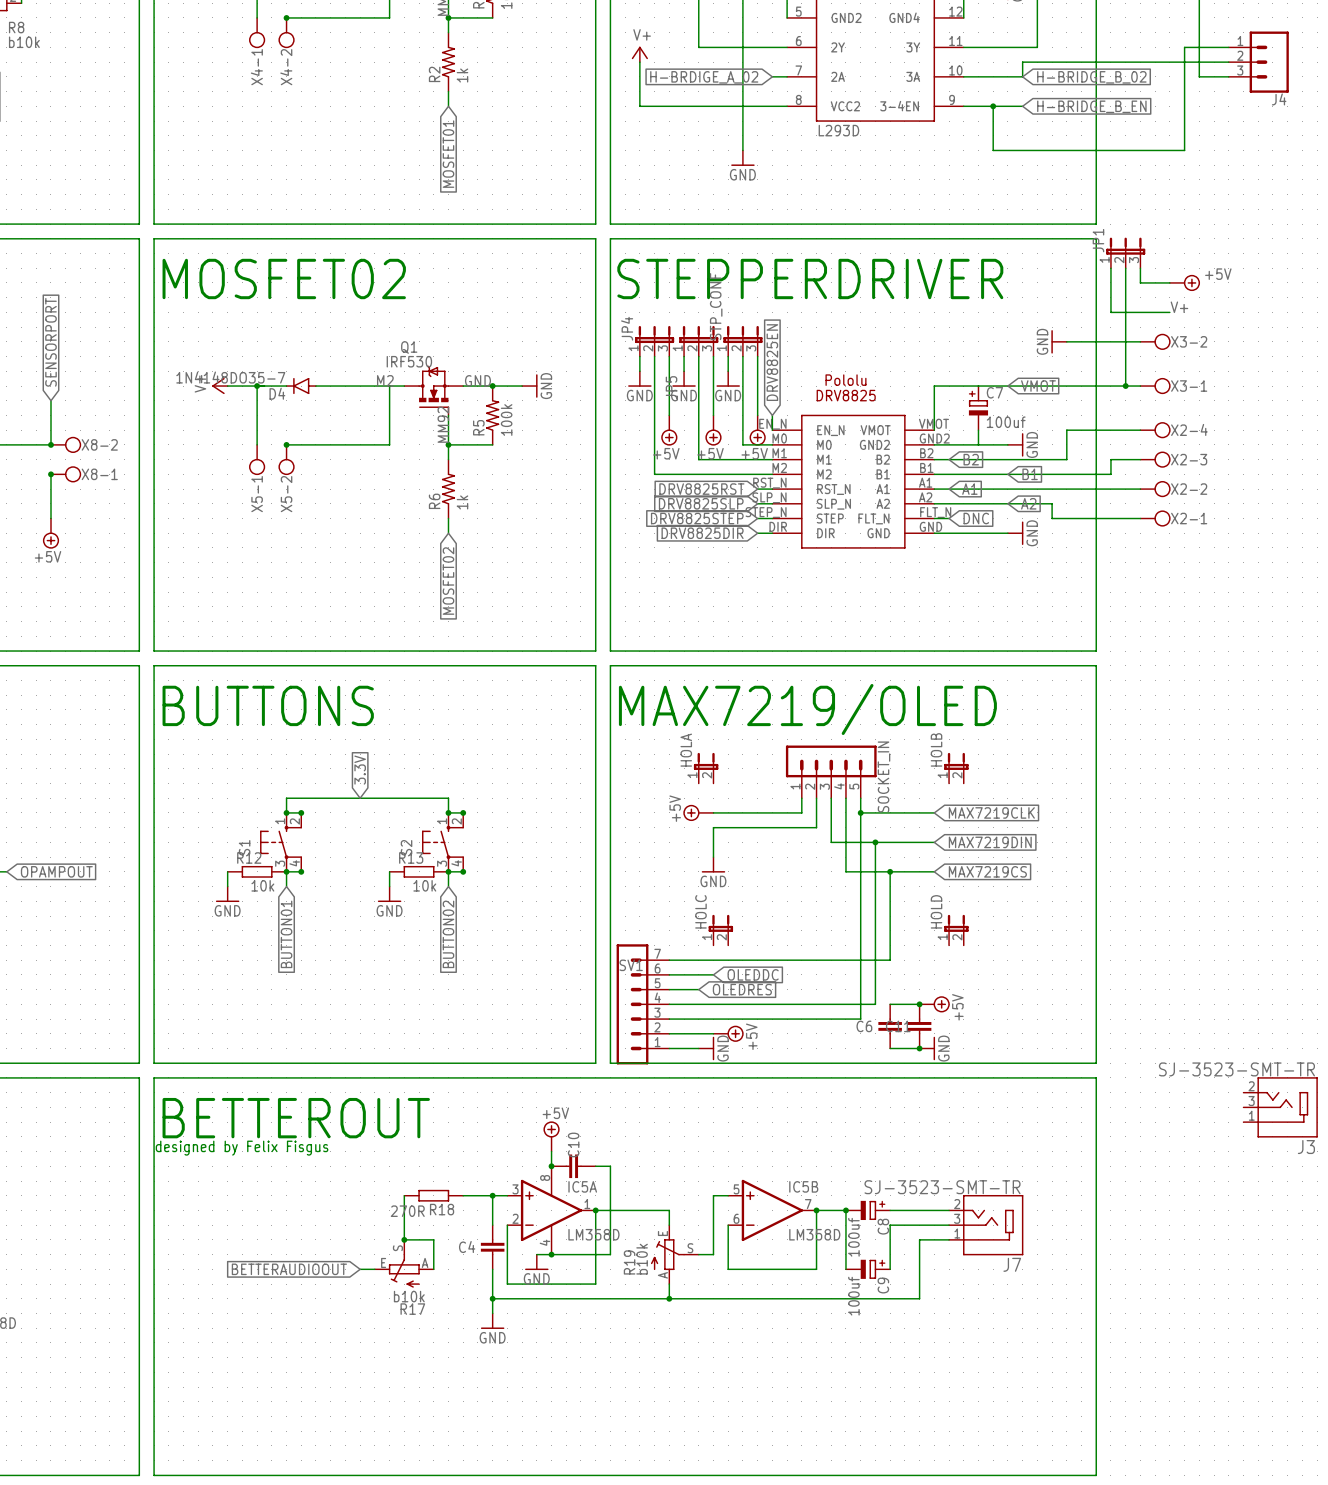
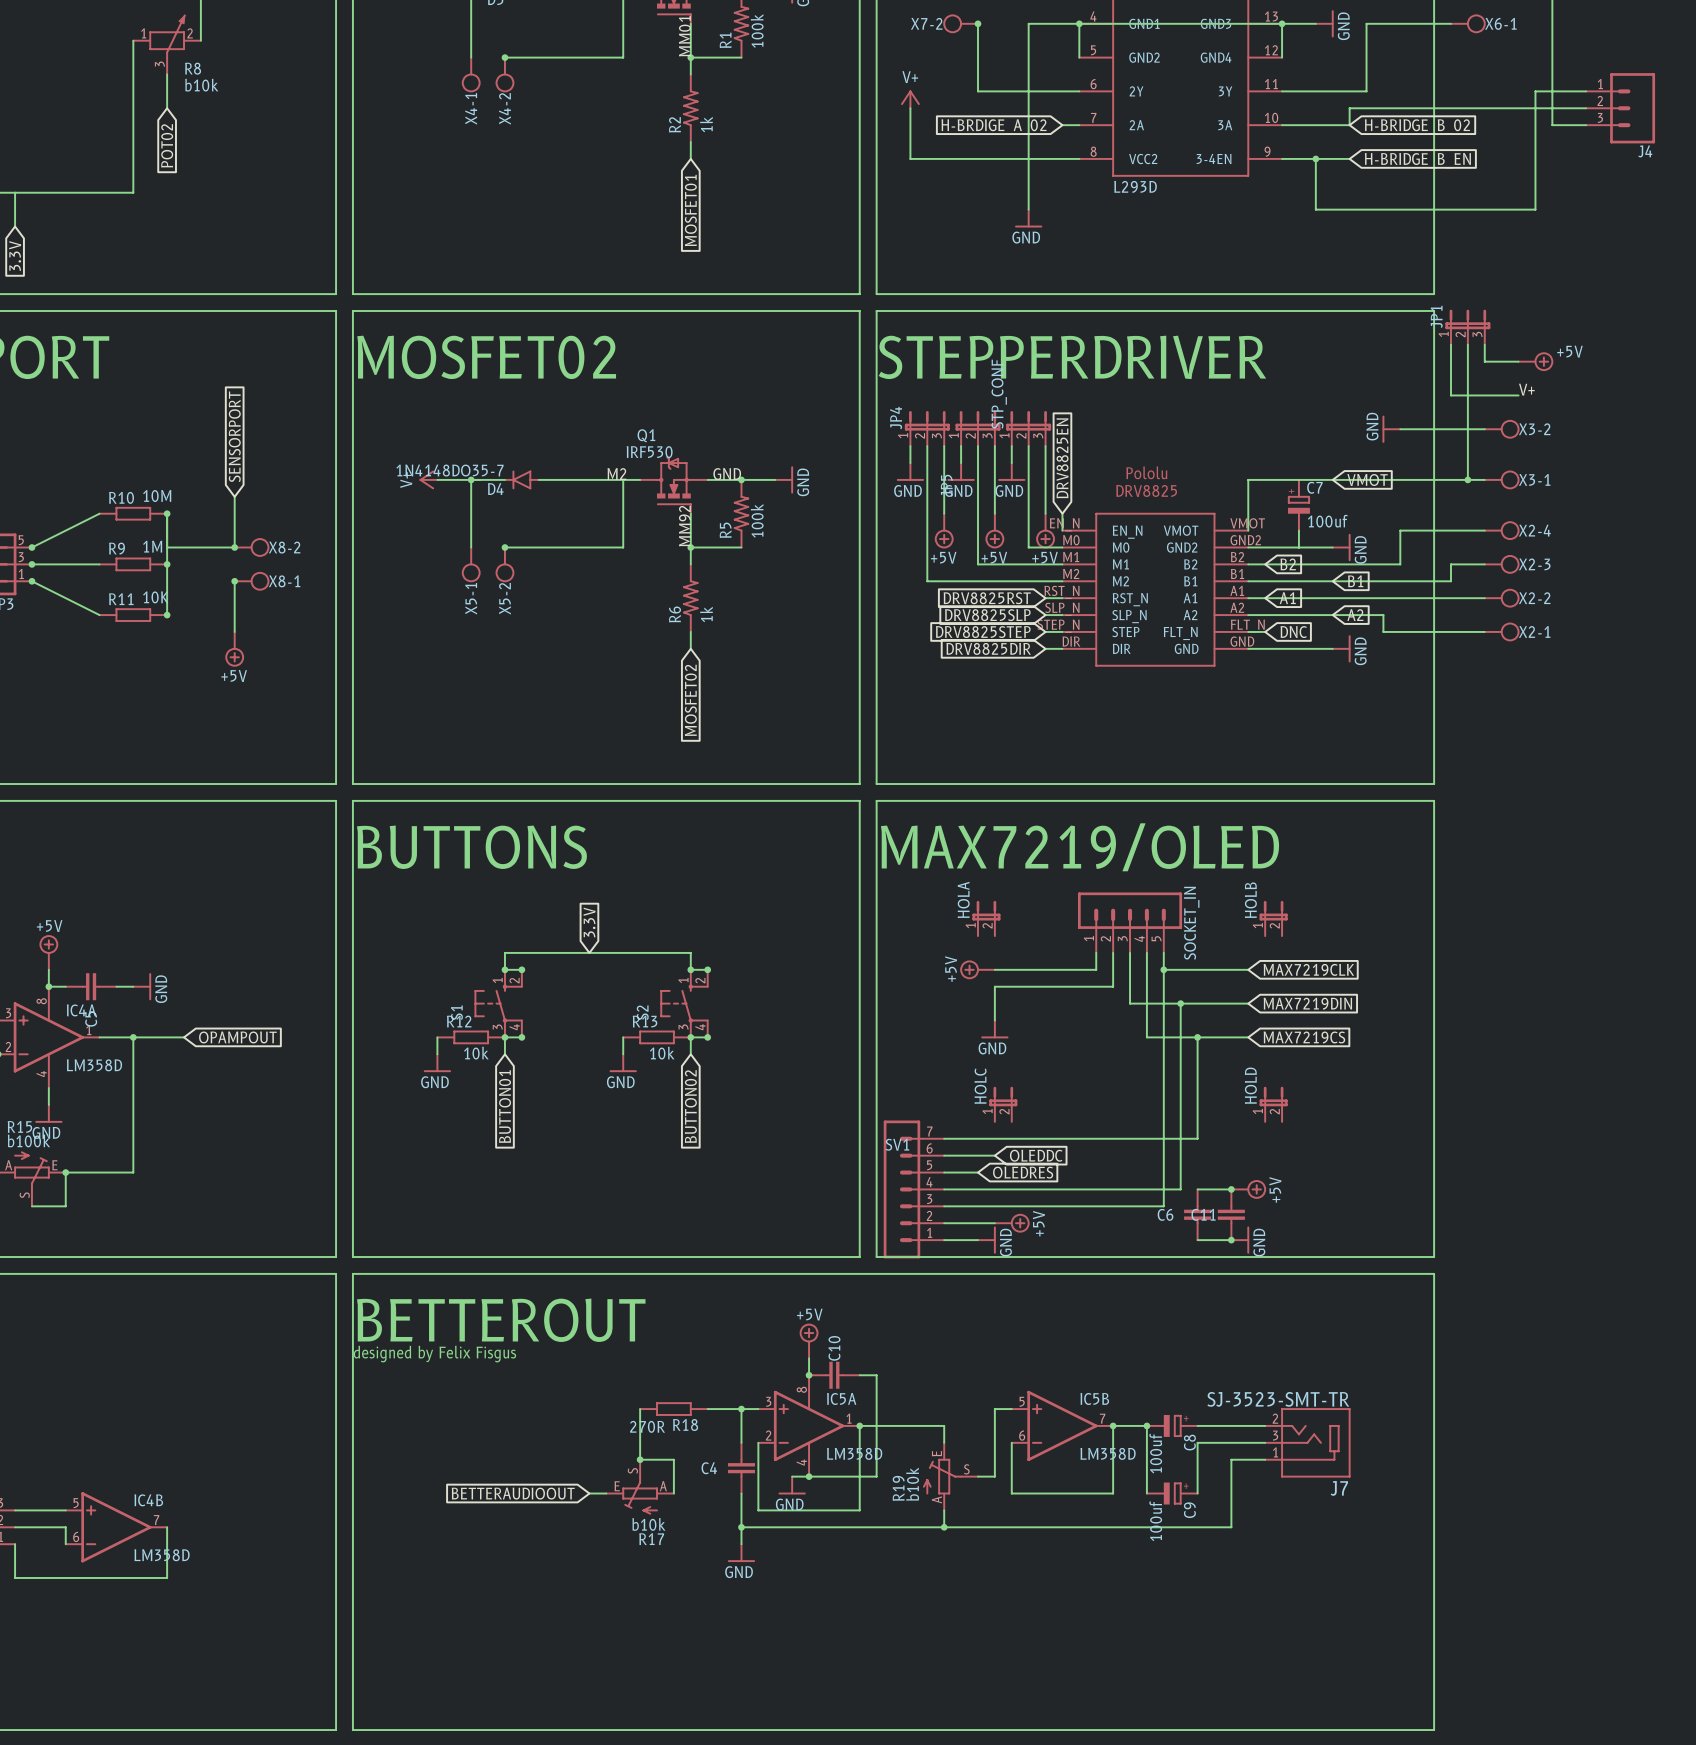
J3: SJ-3523-SMT-TR (1280, 1107) -> none

